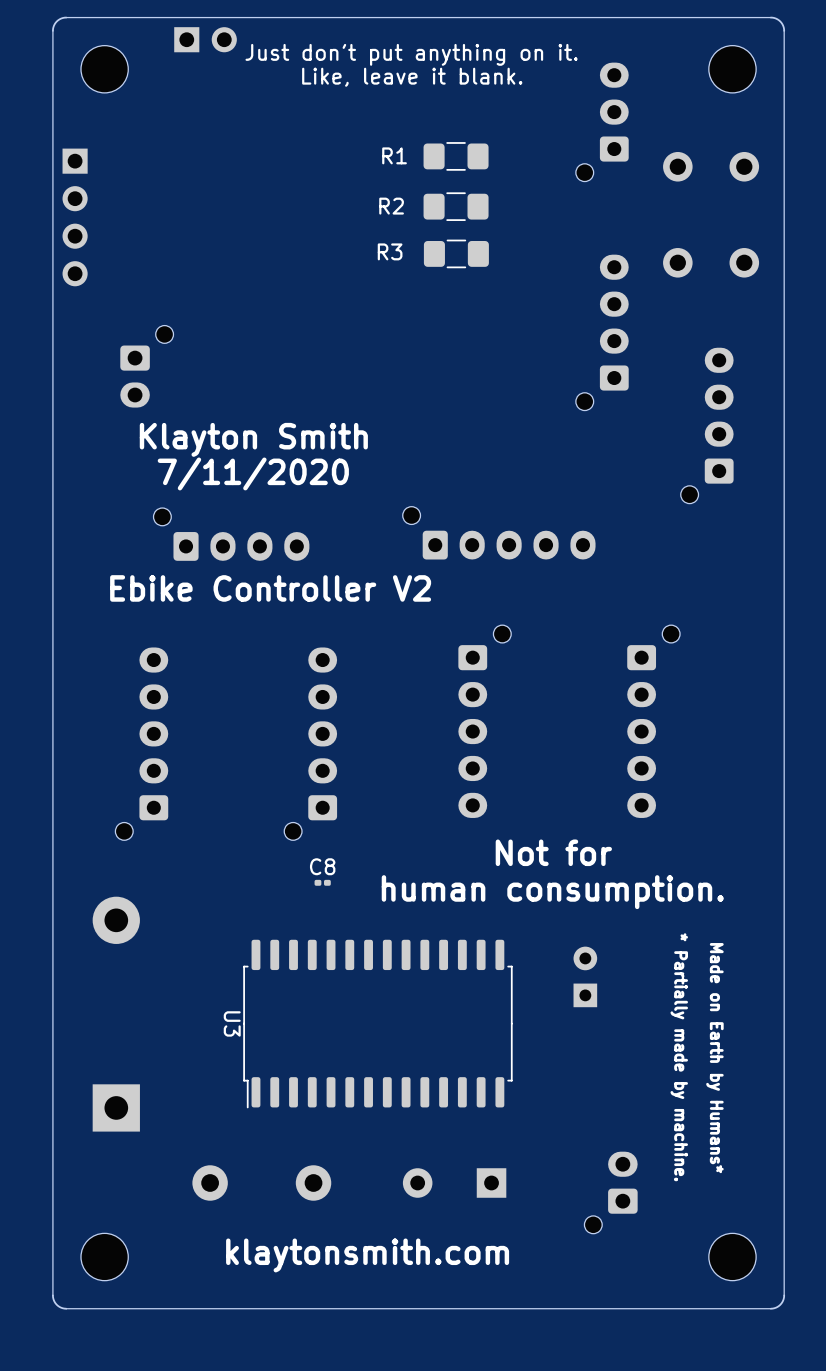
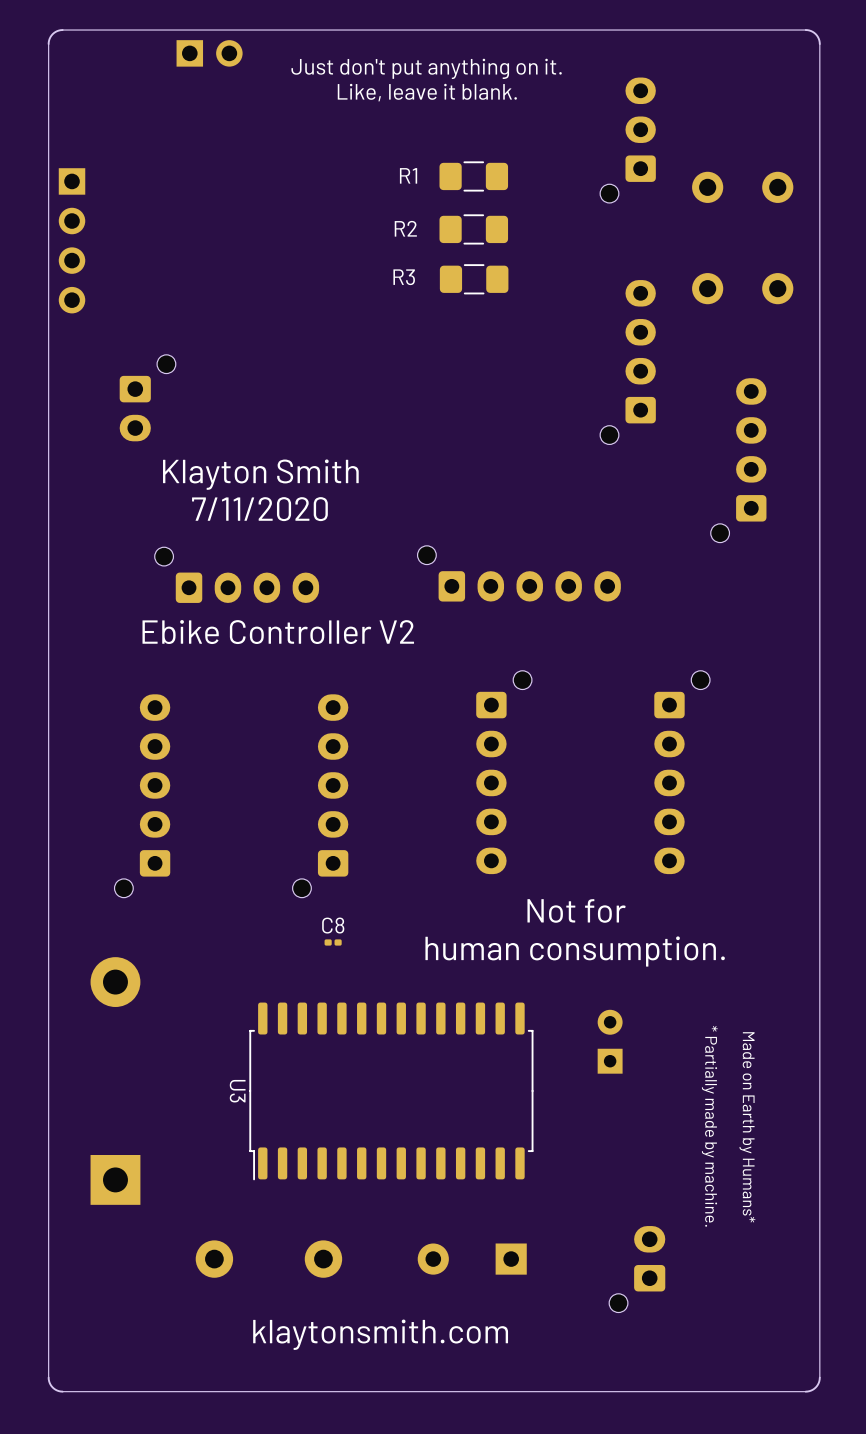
part: (104, 69) -> none
part: (732, 69) -> none
part: (104, 1257) -> none
part: (732, 1257) -> none

